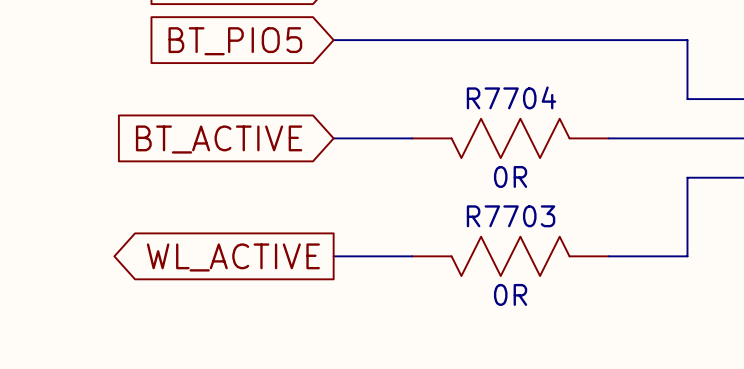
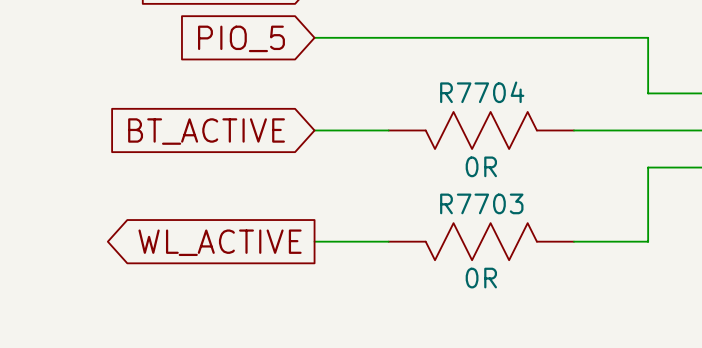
global label: BT_PIO5 (235, 41) -> PIO_5 (241, 38)

